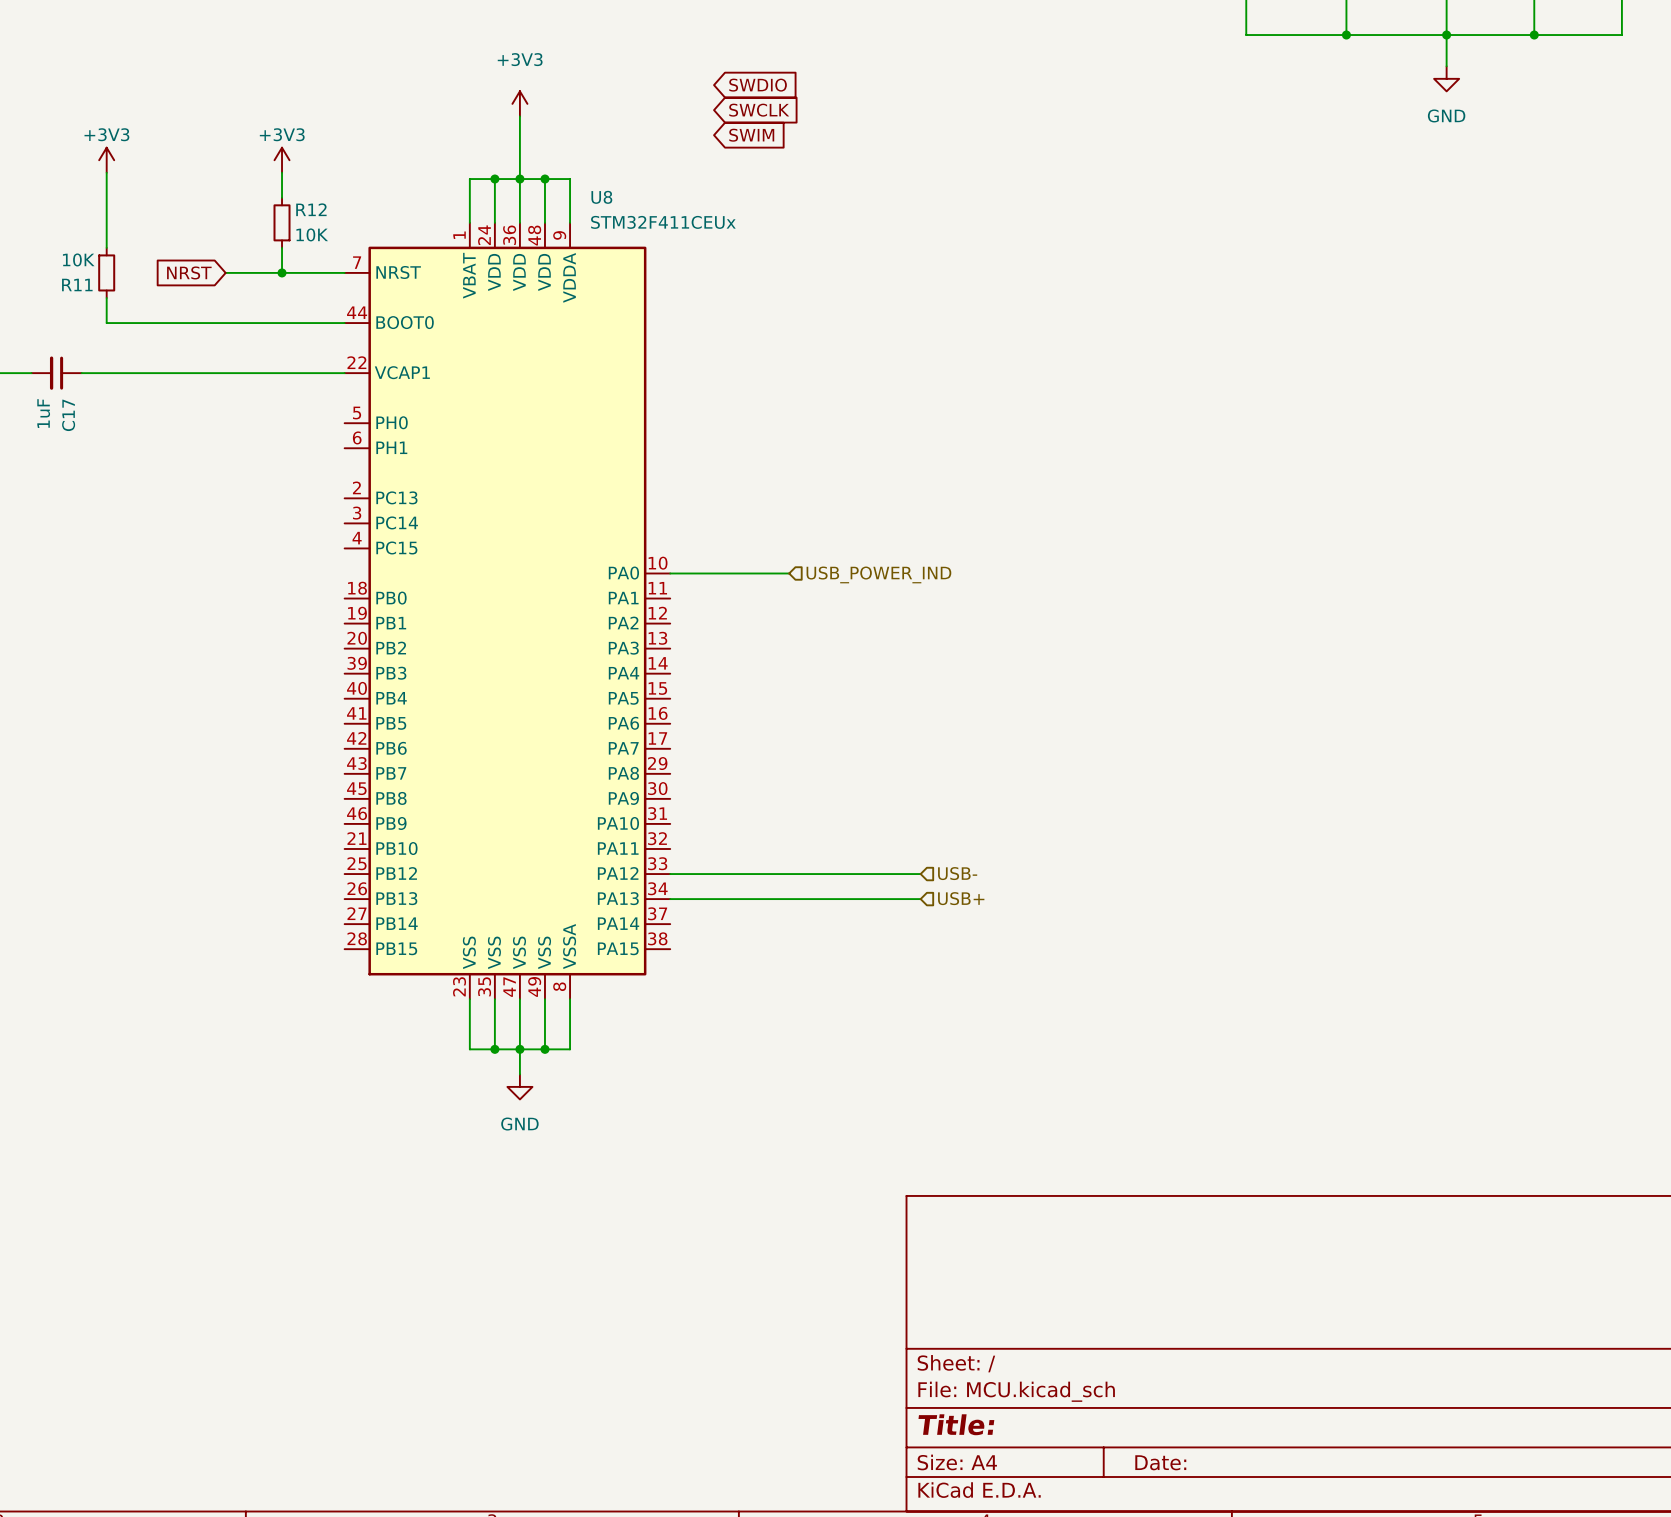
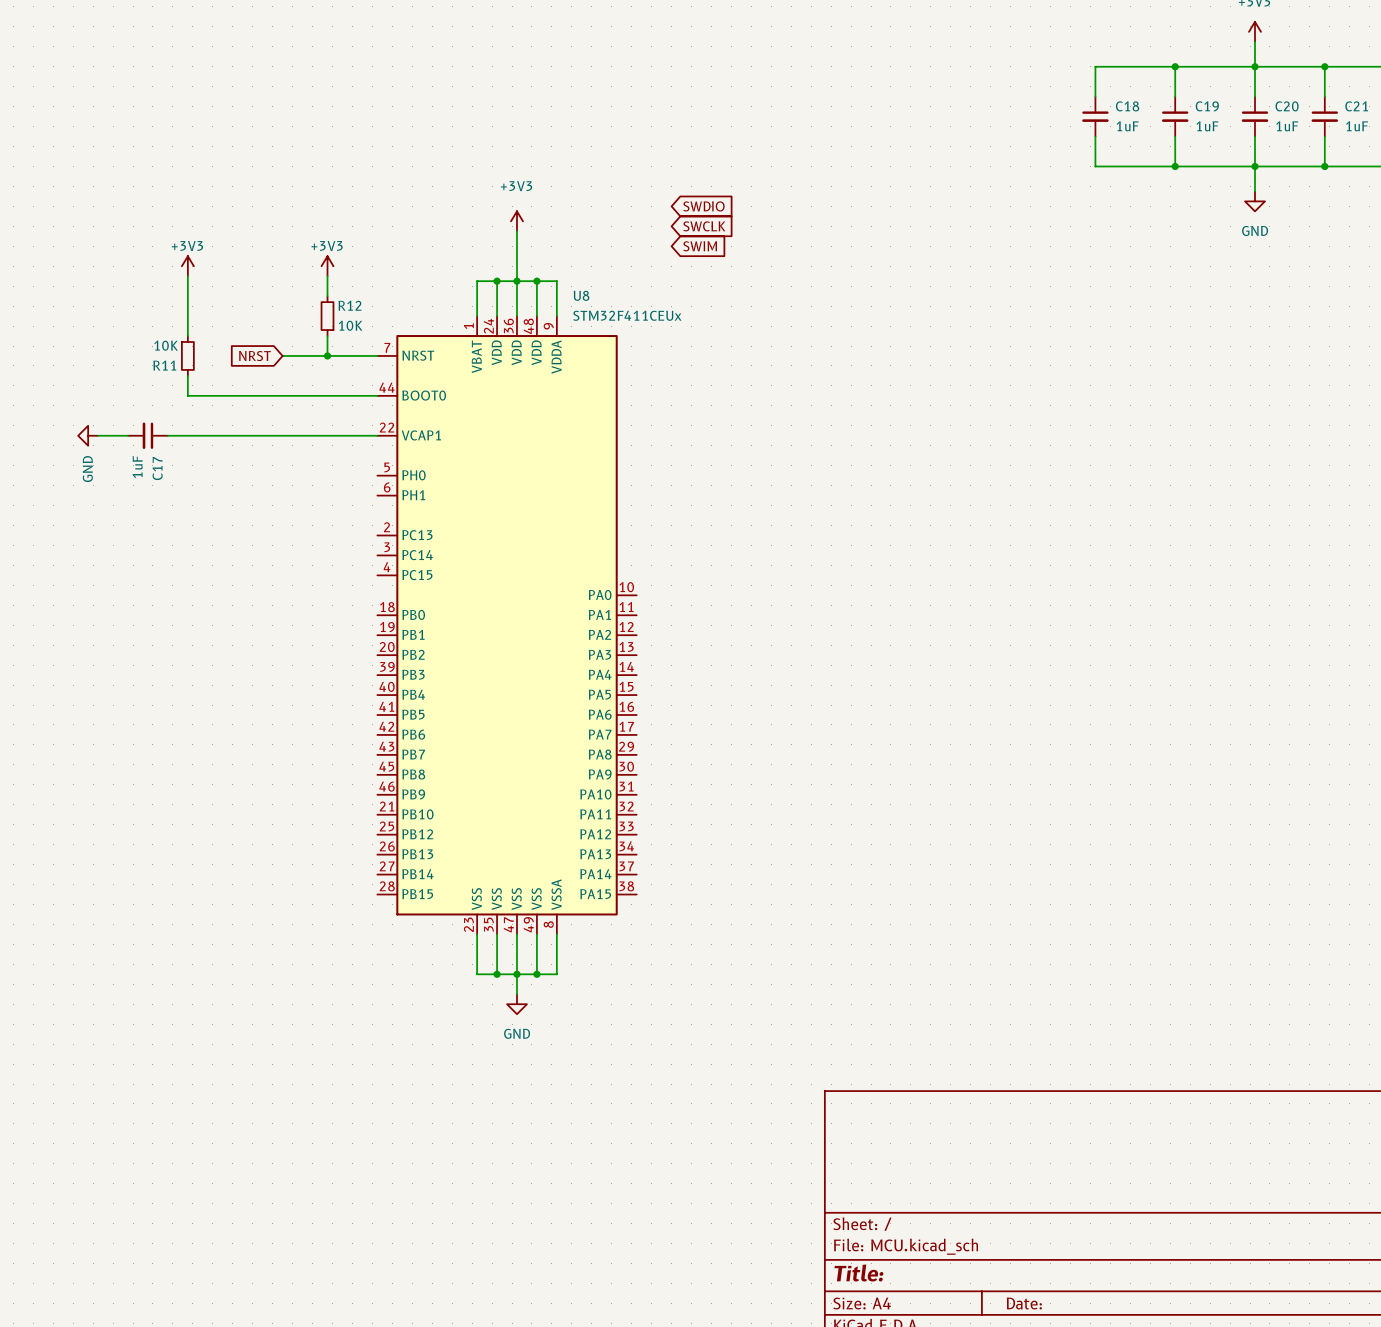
wire: (670, 573) (789, 573) -> none
hierarchical label: USB_POWER_IND (878, 574) -> none
hierarchical label: USB- (957, 873) -> none
wire: (670, 874) (920, 874) -> none
hierarchical label: USB+ (961, 898) -> none
wire: (670, 899) (920, 899) -> none

